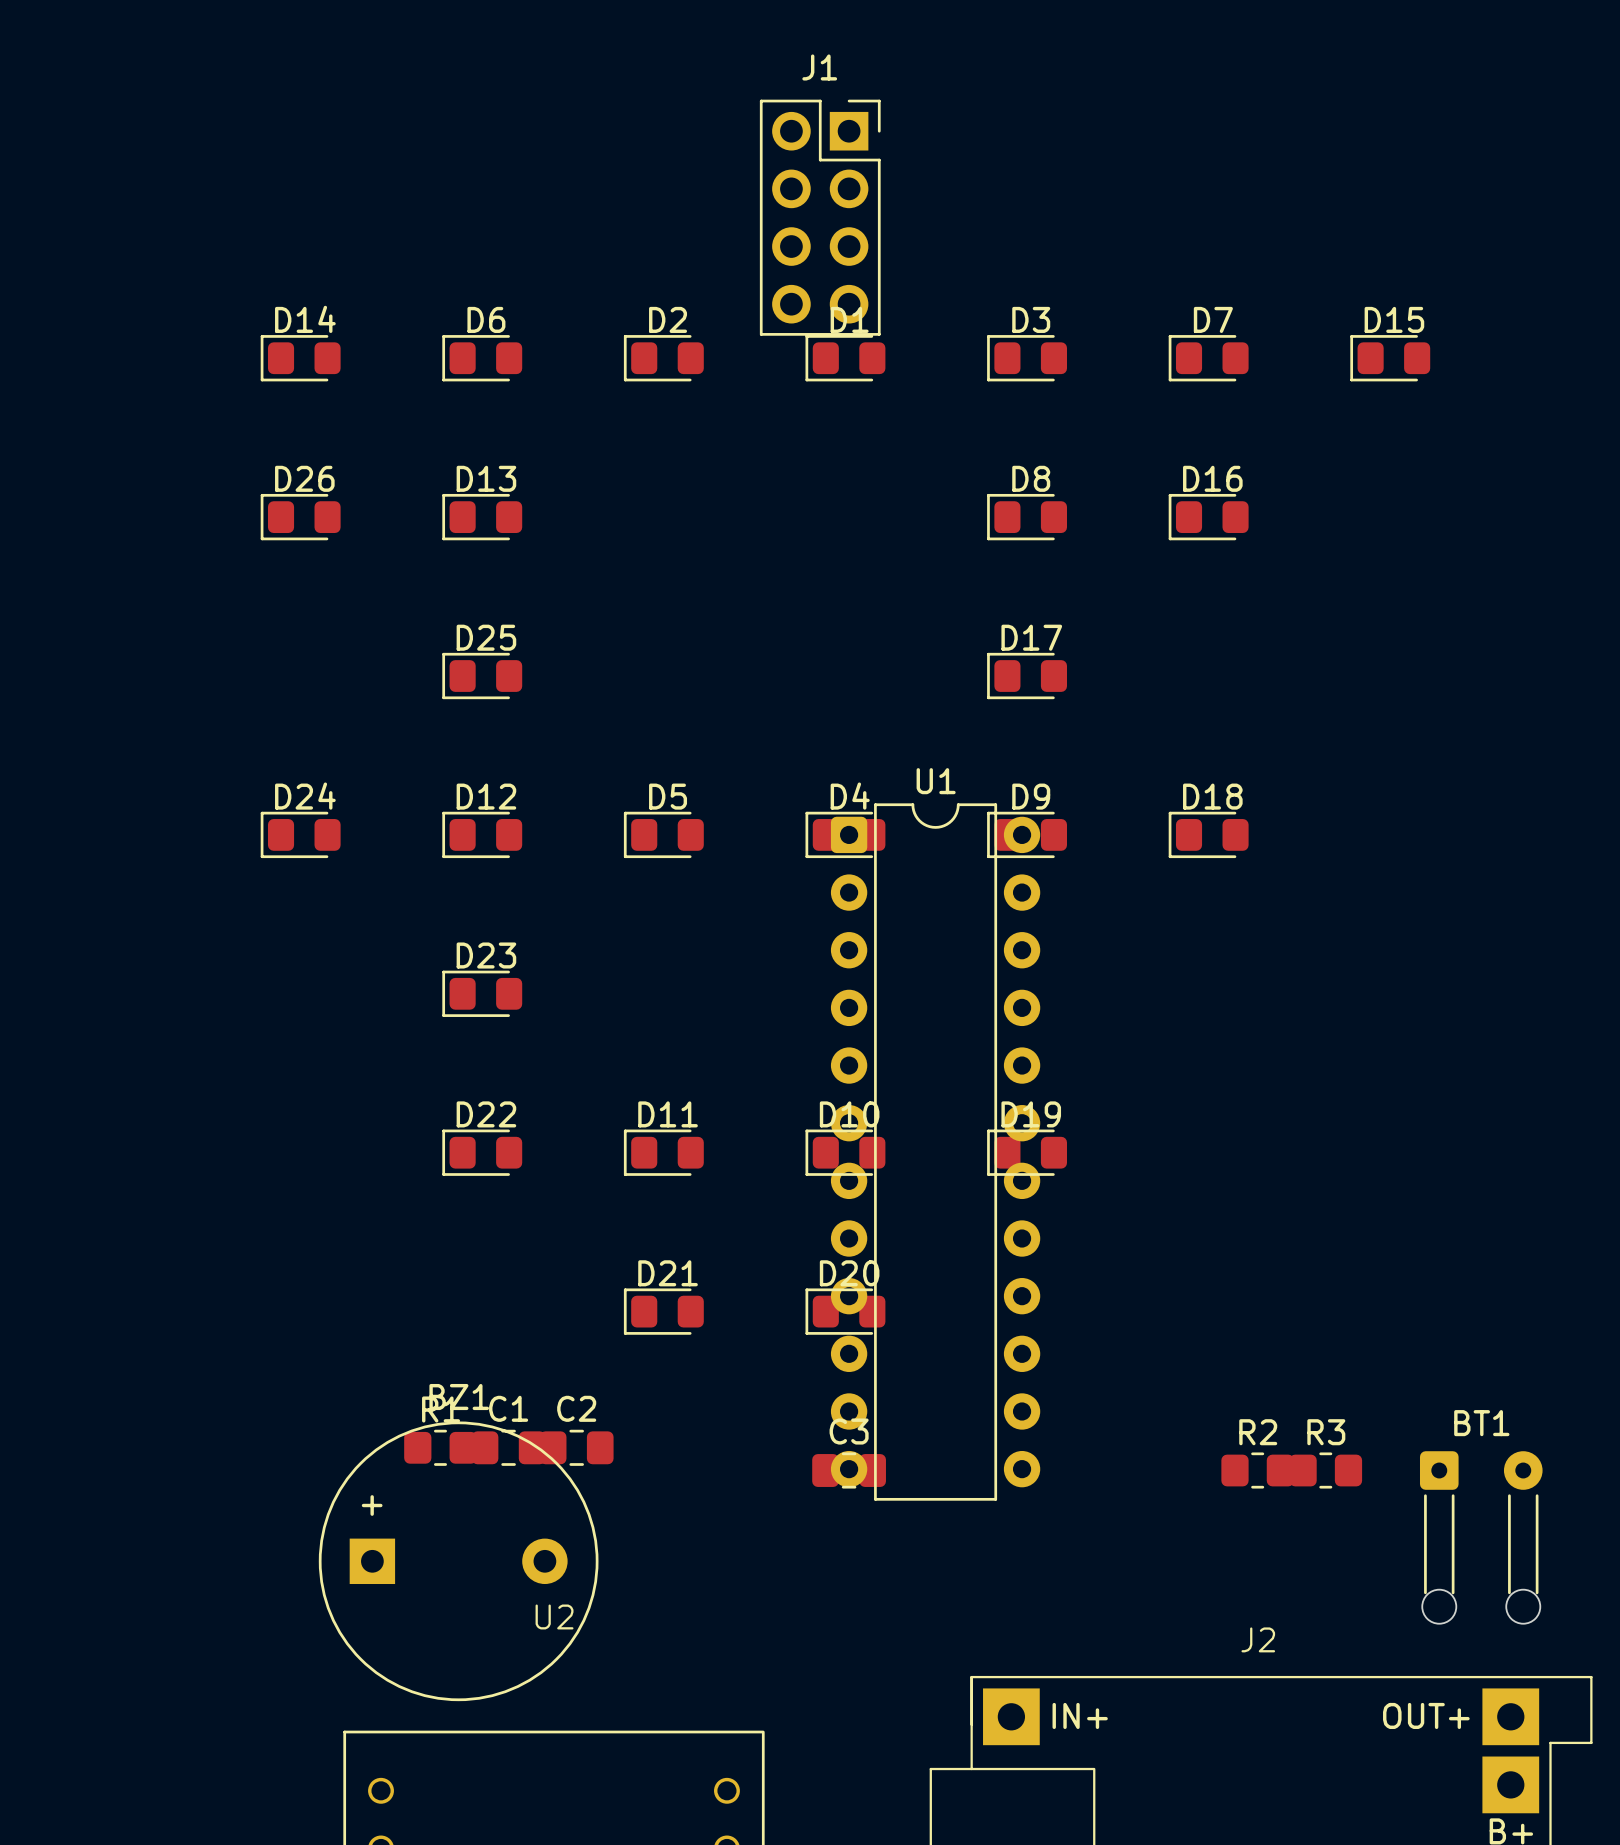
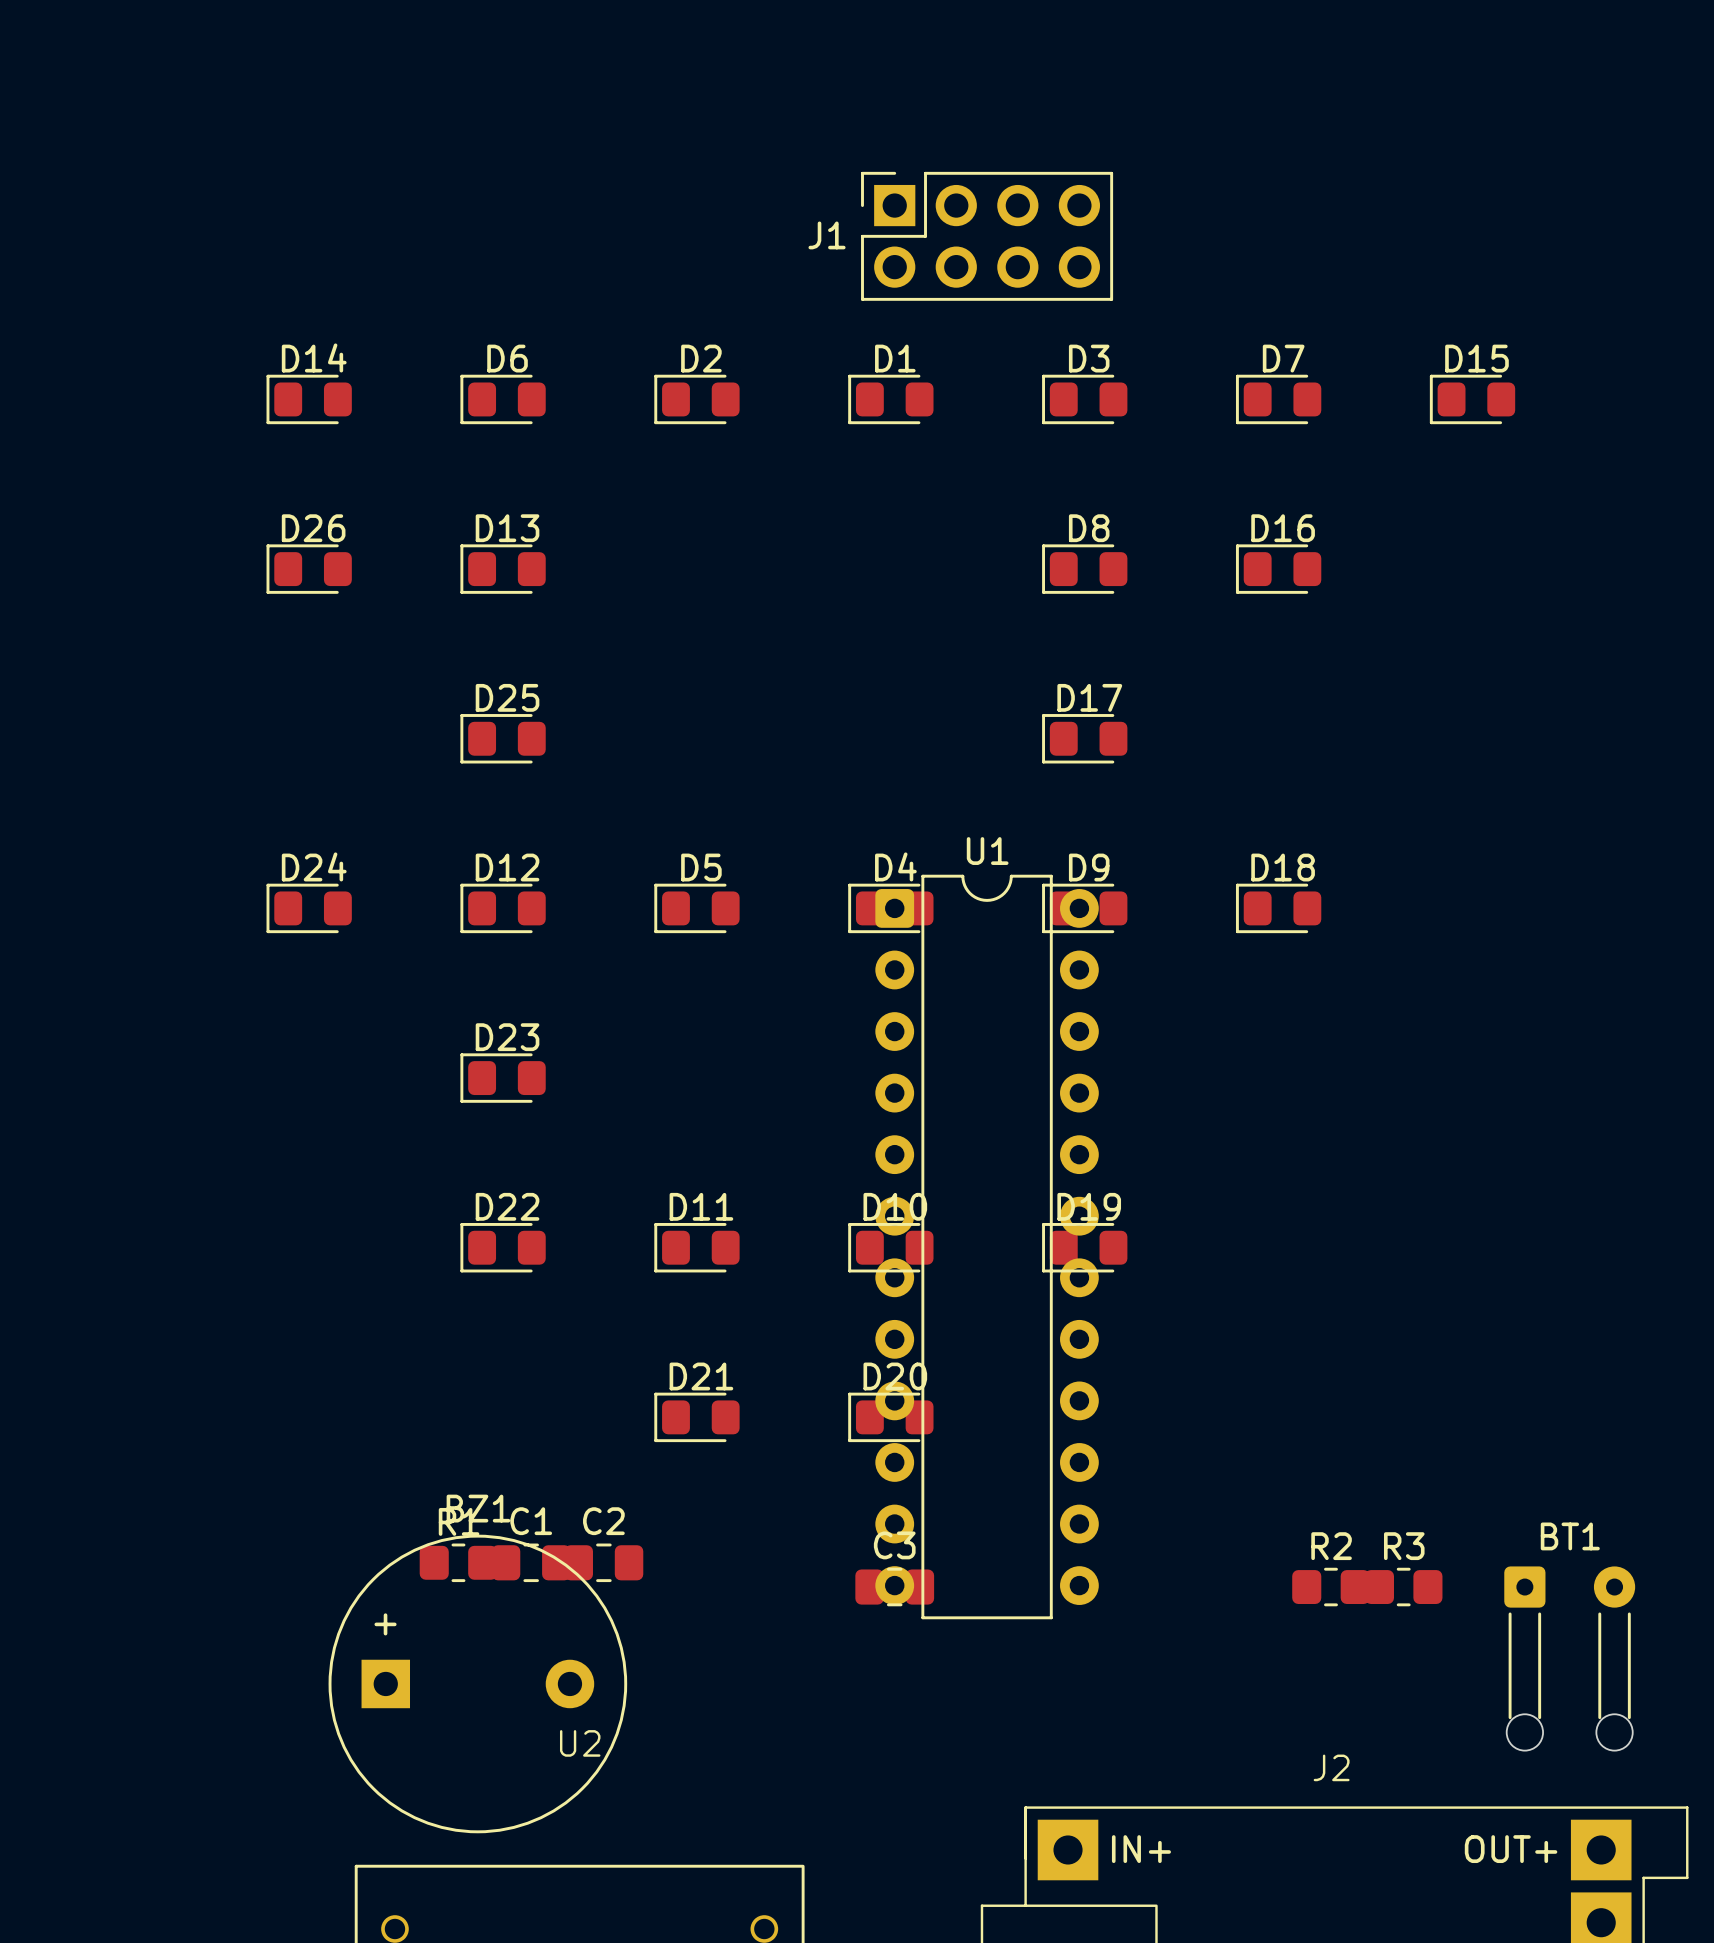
J1 rotation: 0° (820, 217) -> 90° counterclockwise (987, 236)

